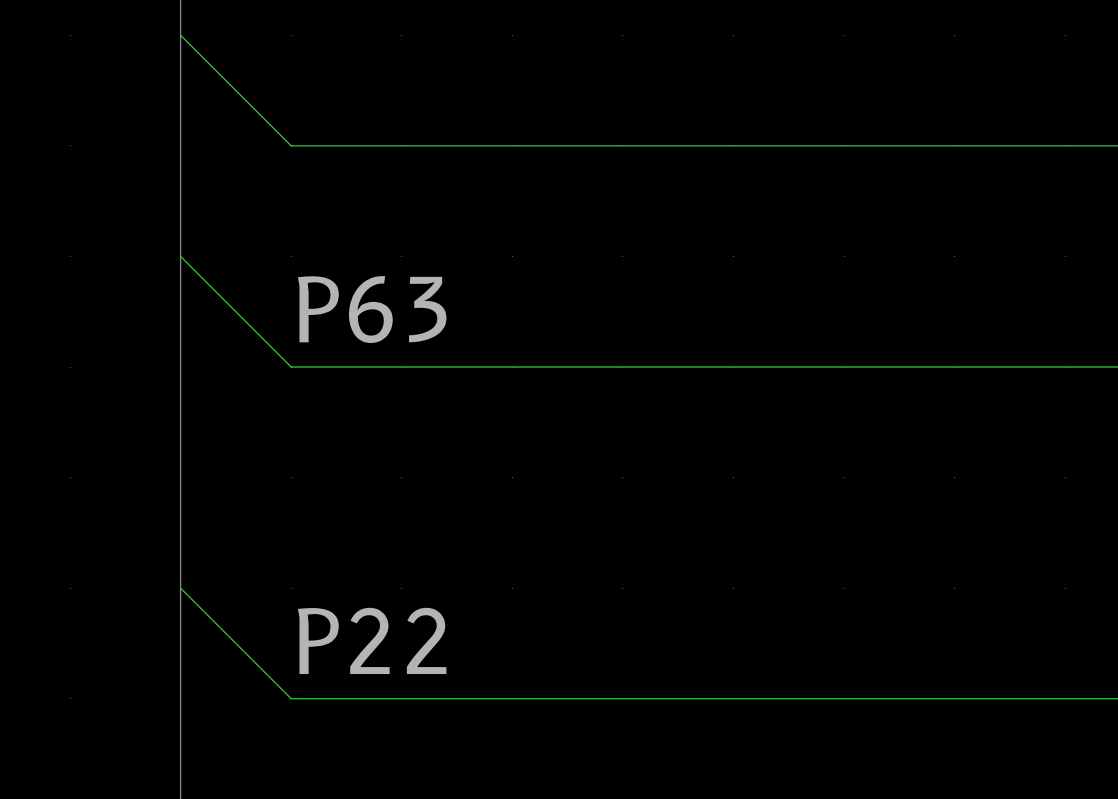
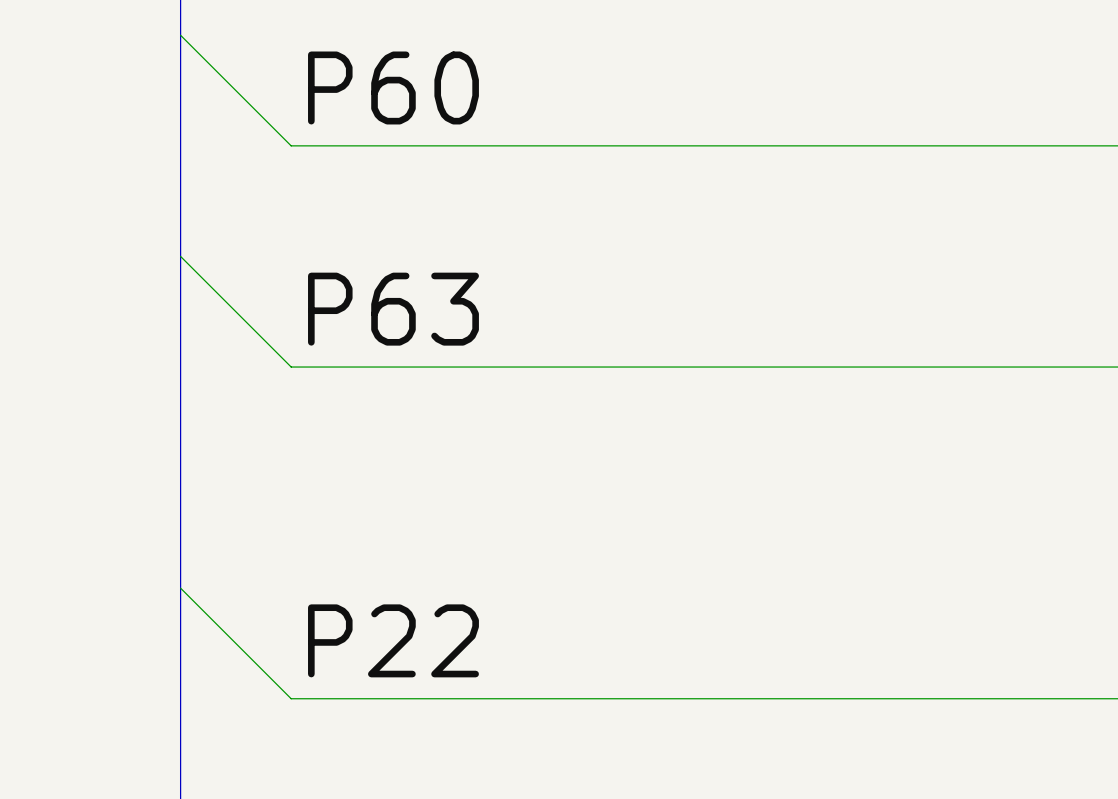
label: none -> P60 (393, 87)

